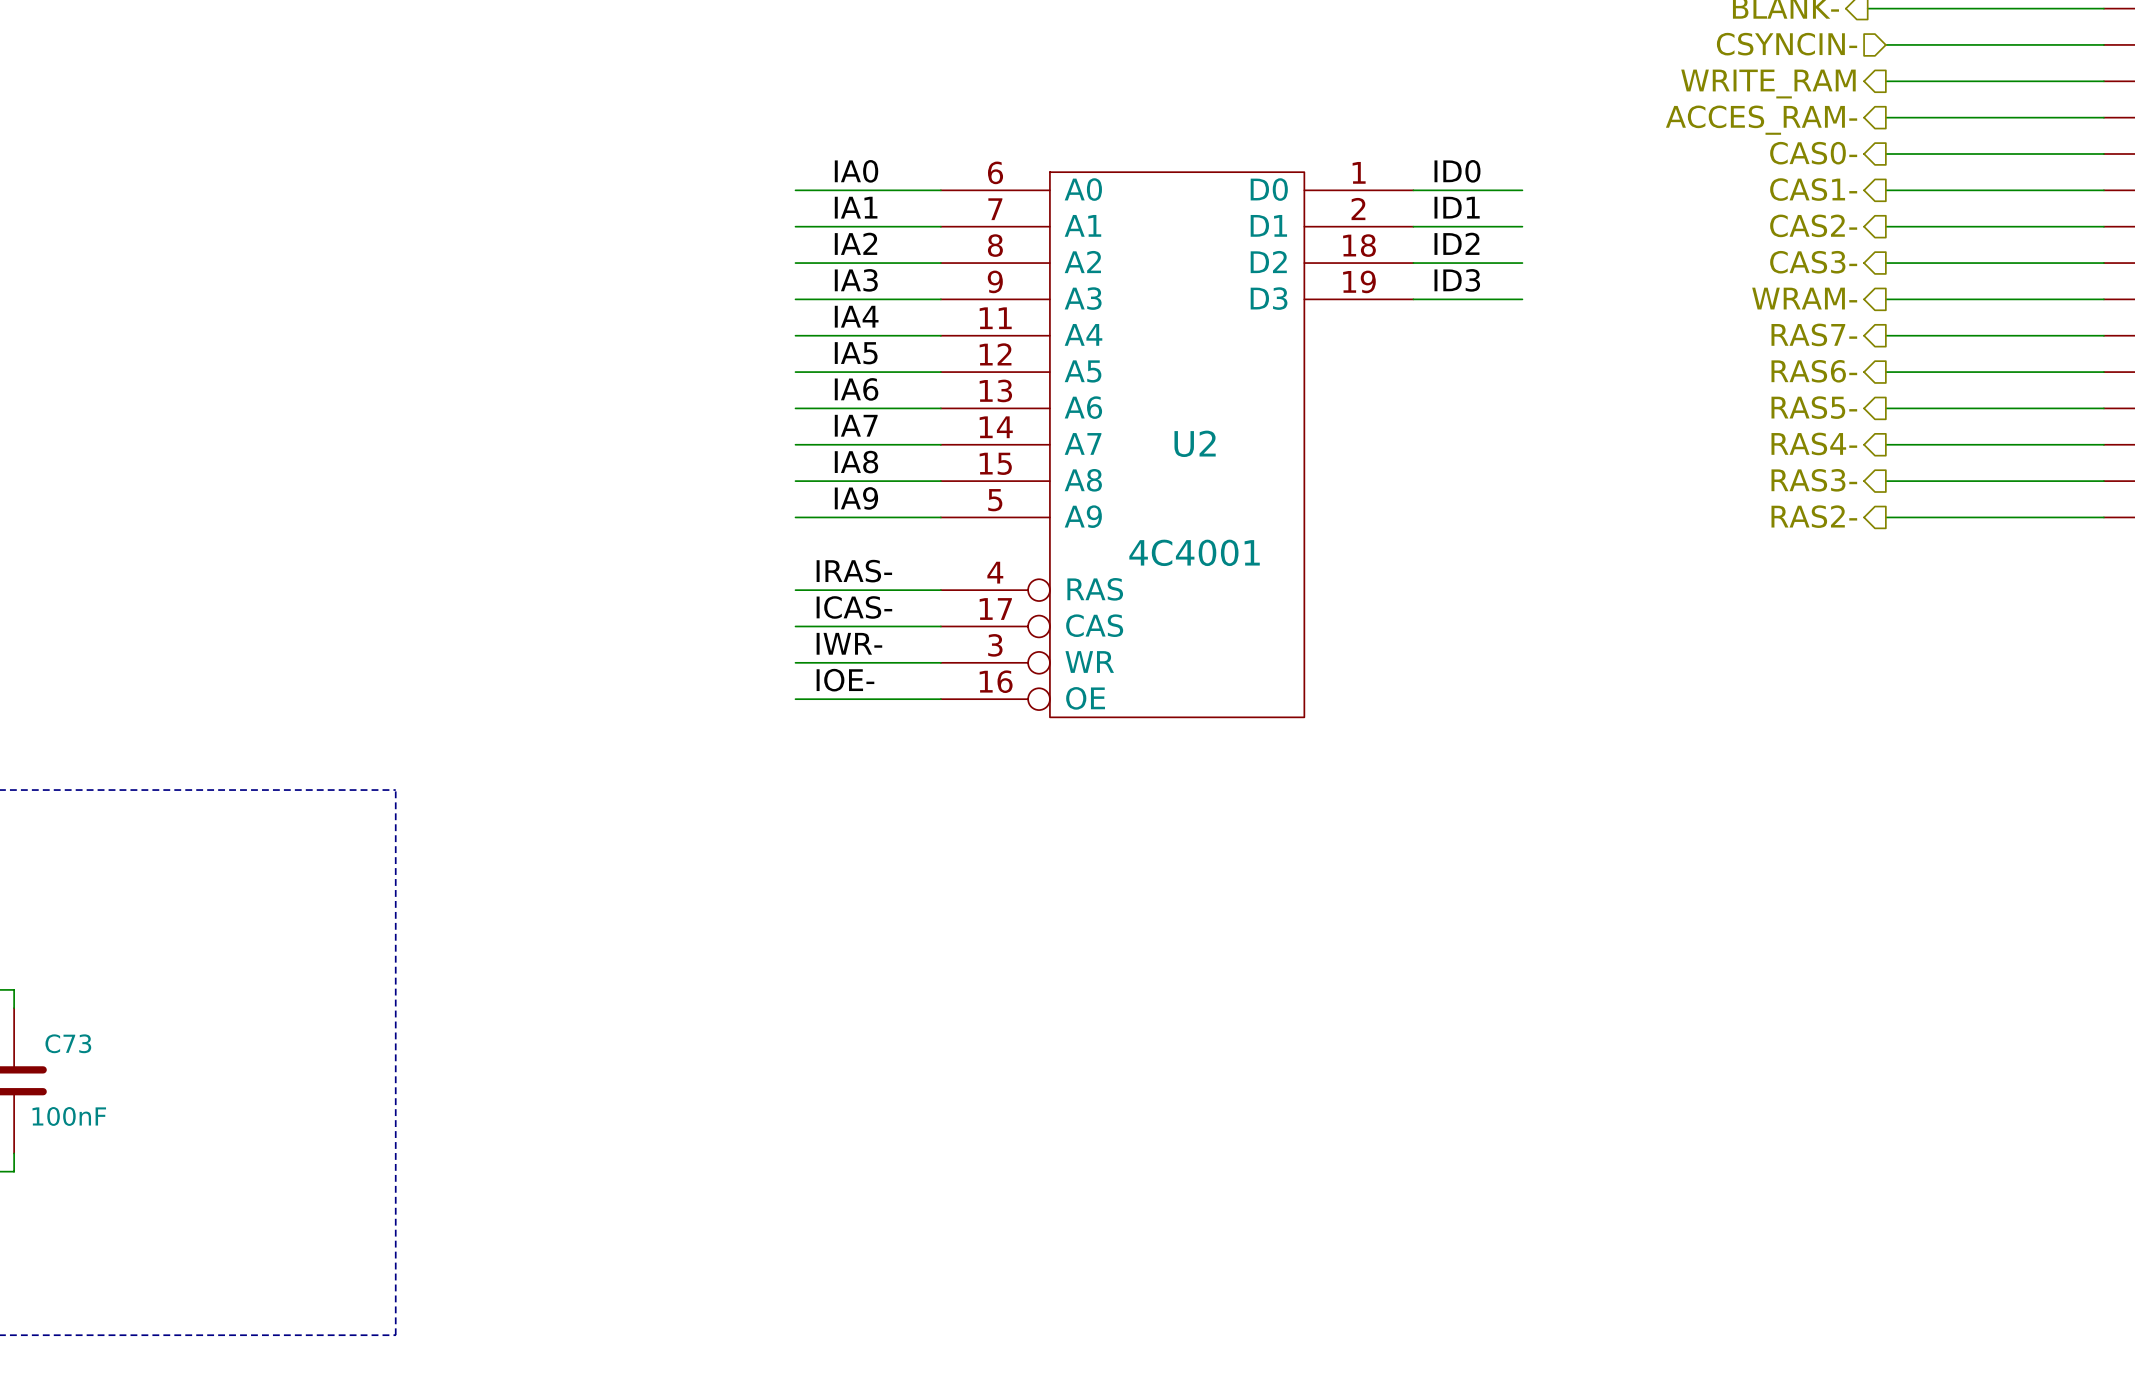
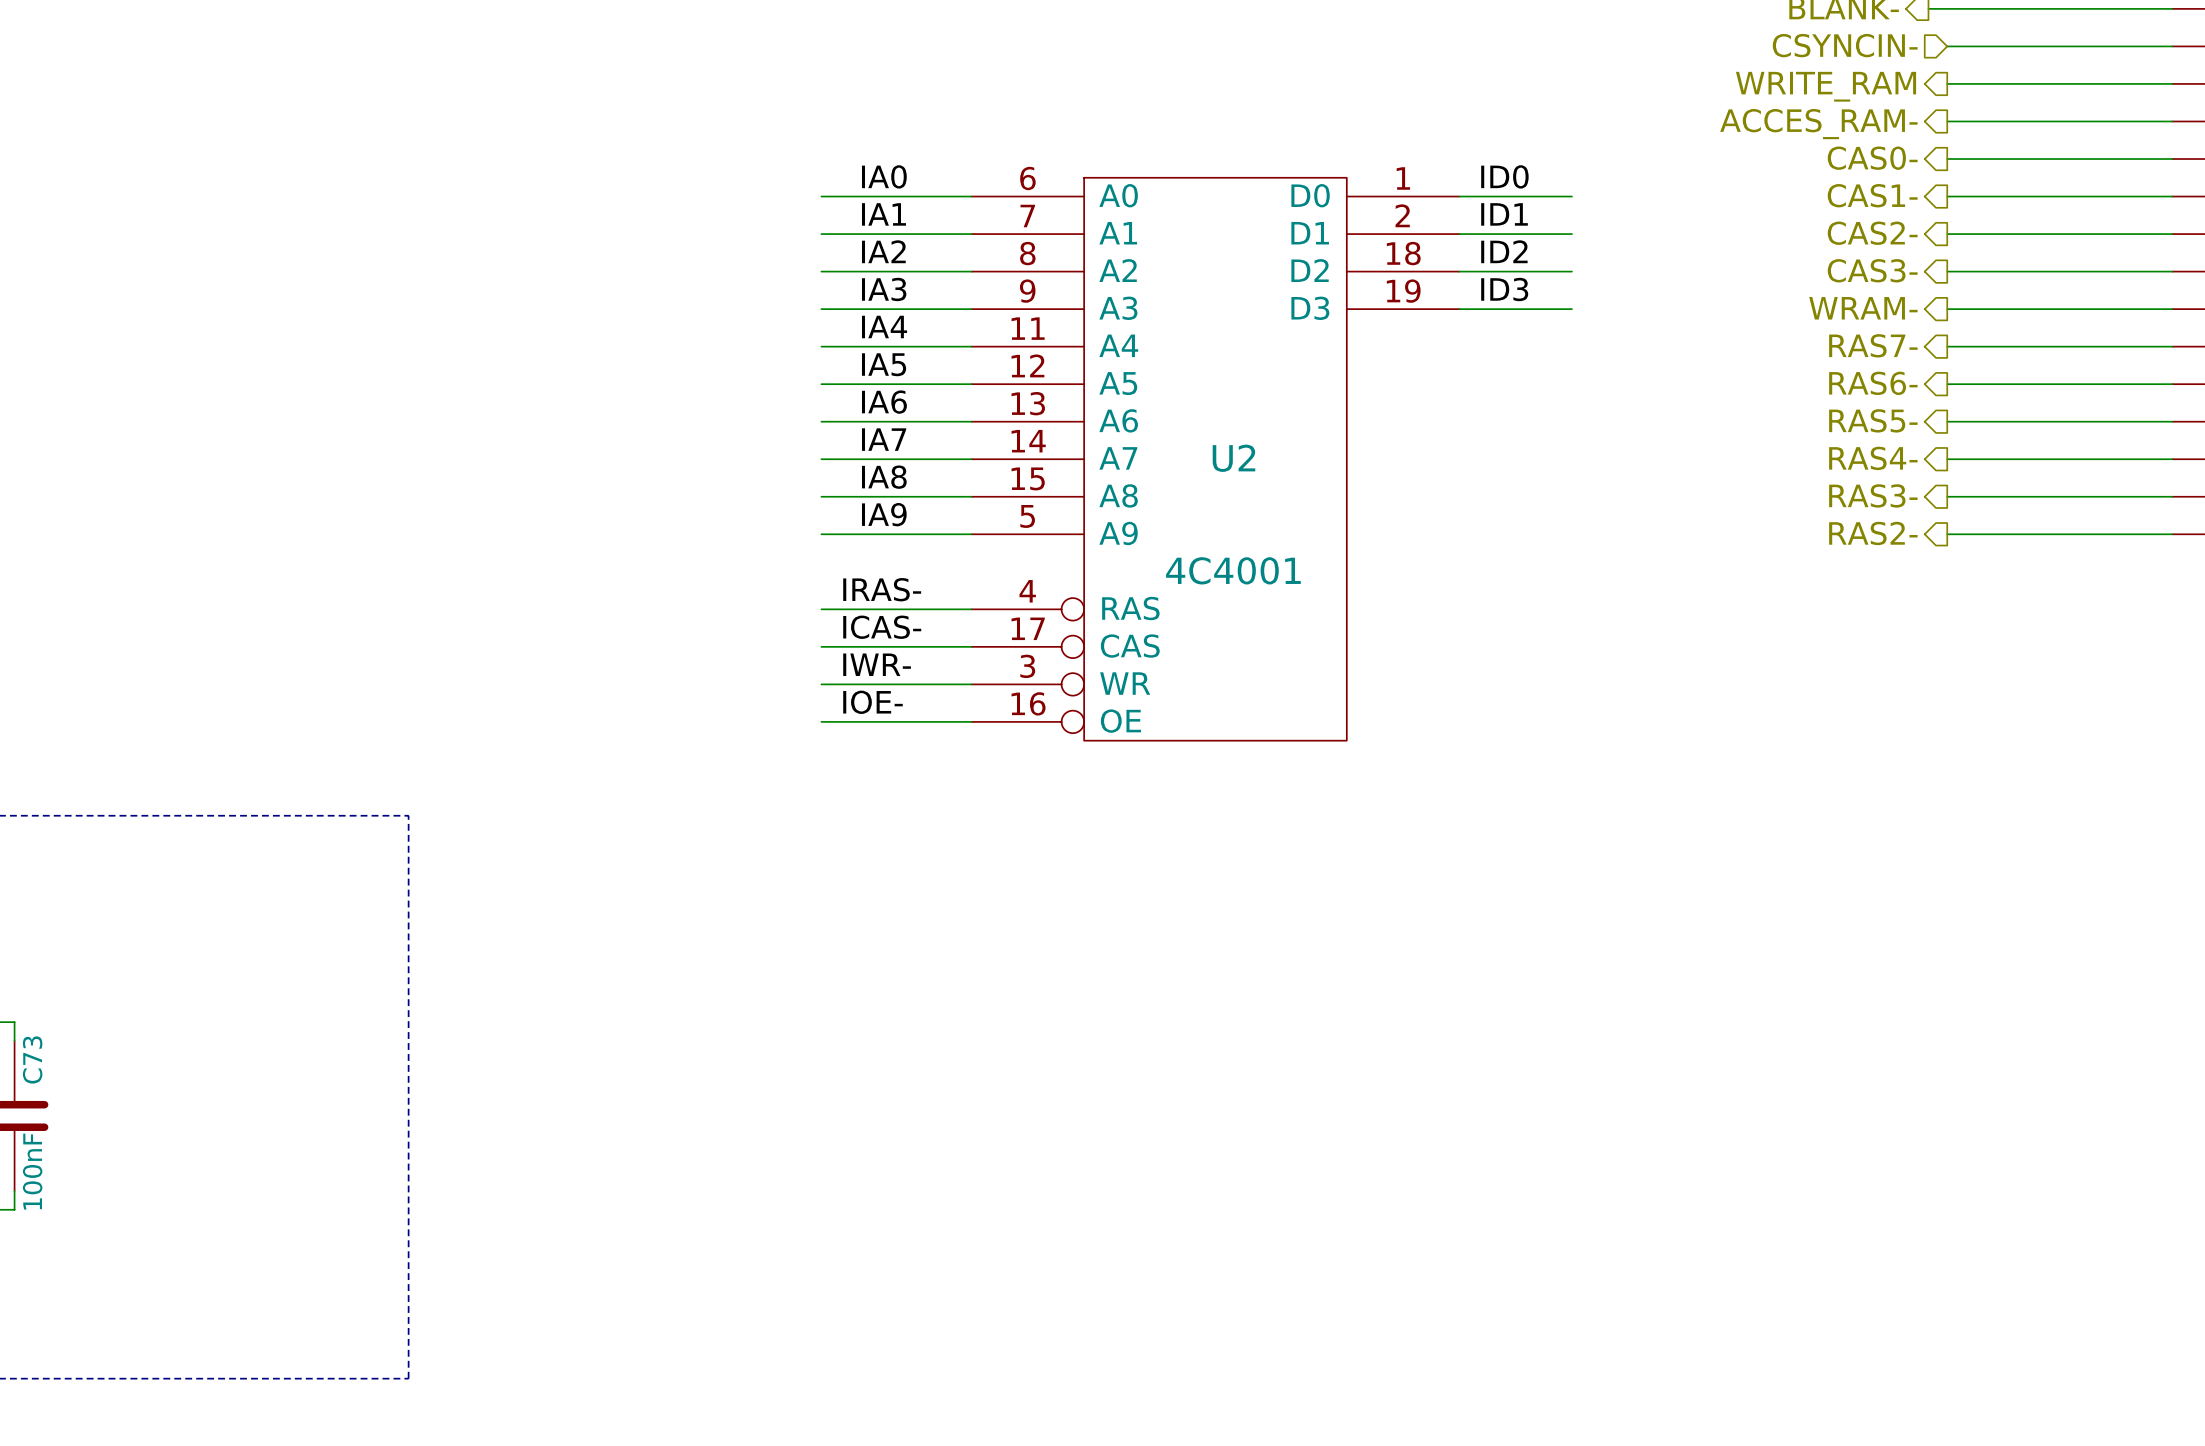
C73 name rotation: 0° (68, 1043) -> 90° counterclockwise (32, 1059)
C73 value rotation: 0° (69, 1116) -> 90° counterclockwise (32, 1171)

